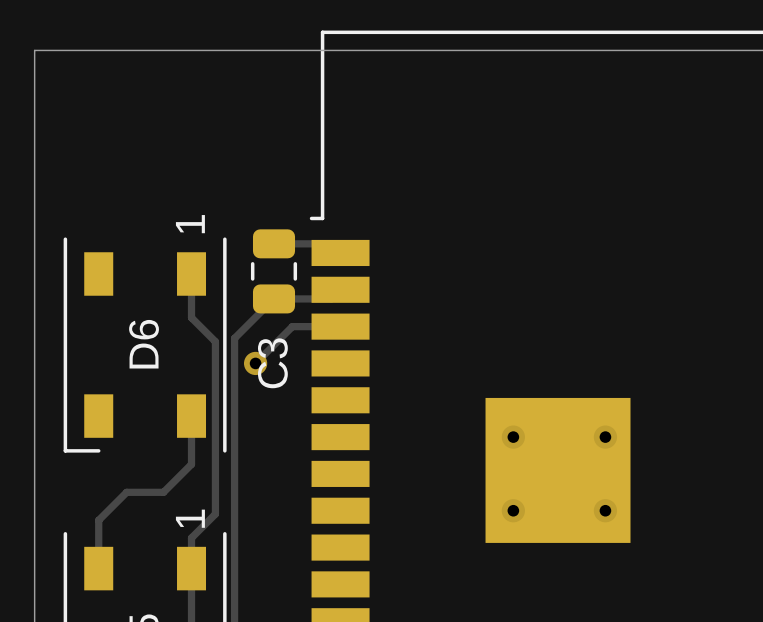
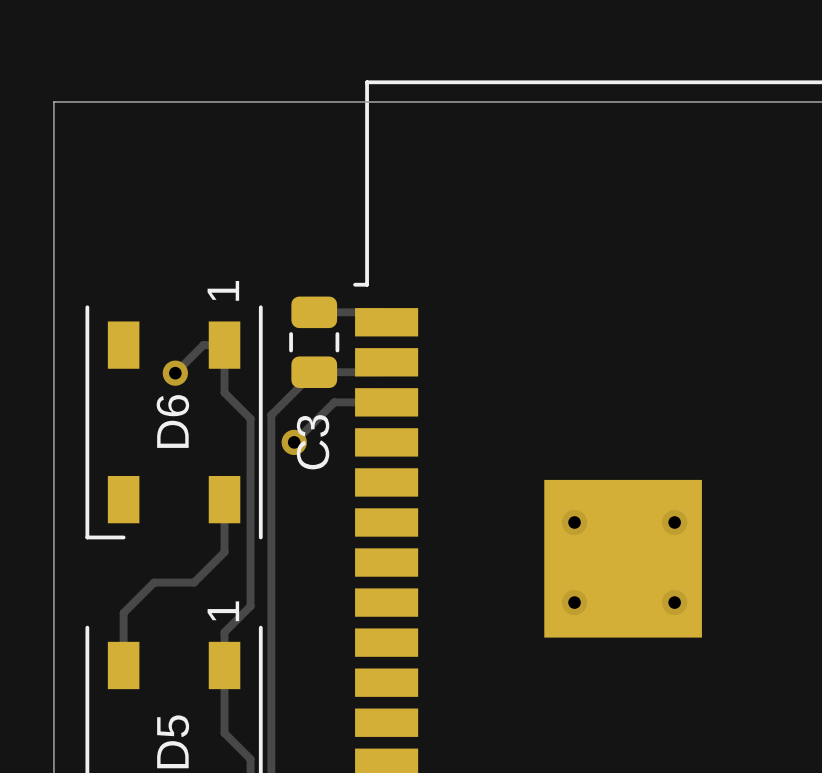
track: none -> (224, 345) (203, 345) (175, 373)
via: none -> (175, 373)

